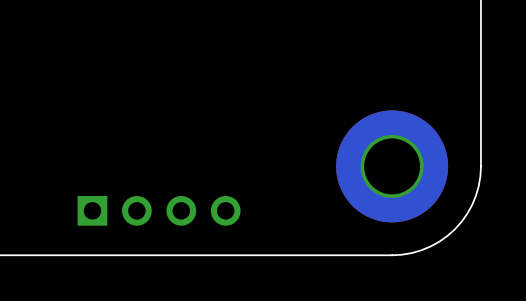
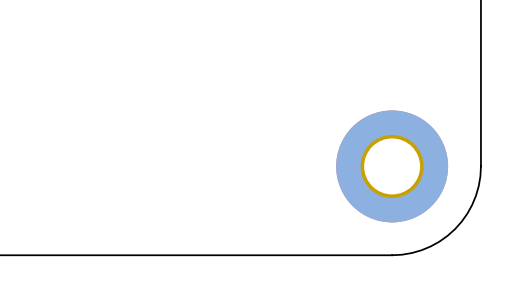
part: (159, 210) -> none

